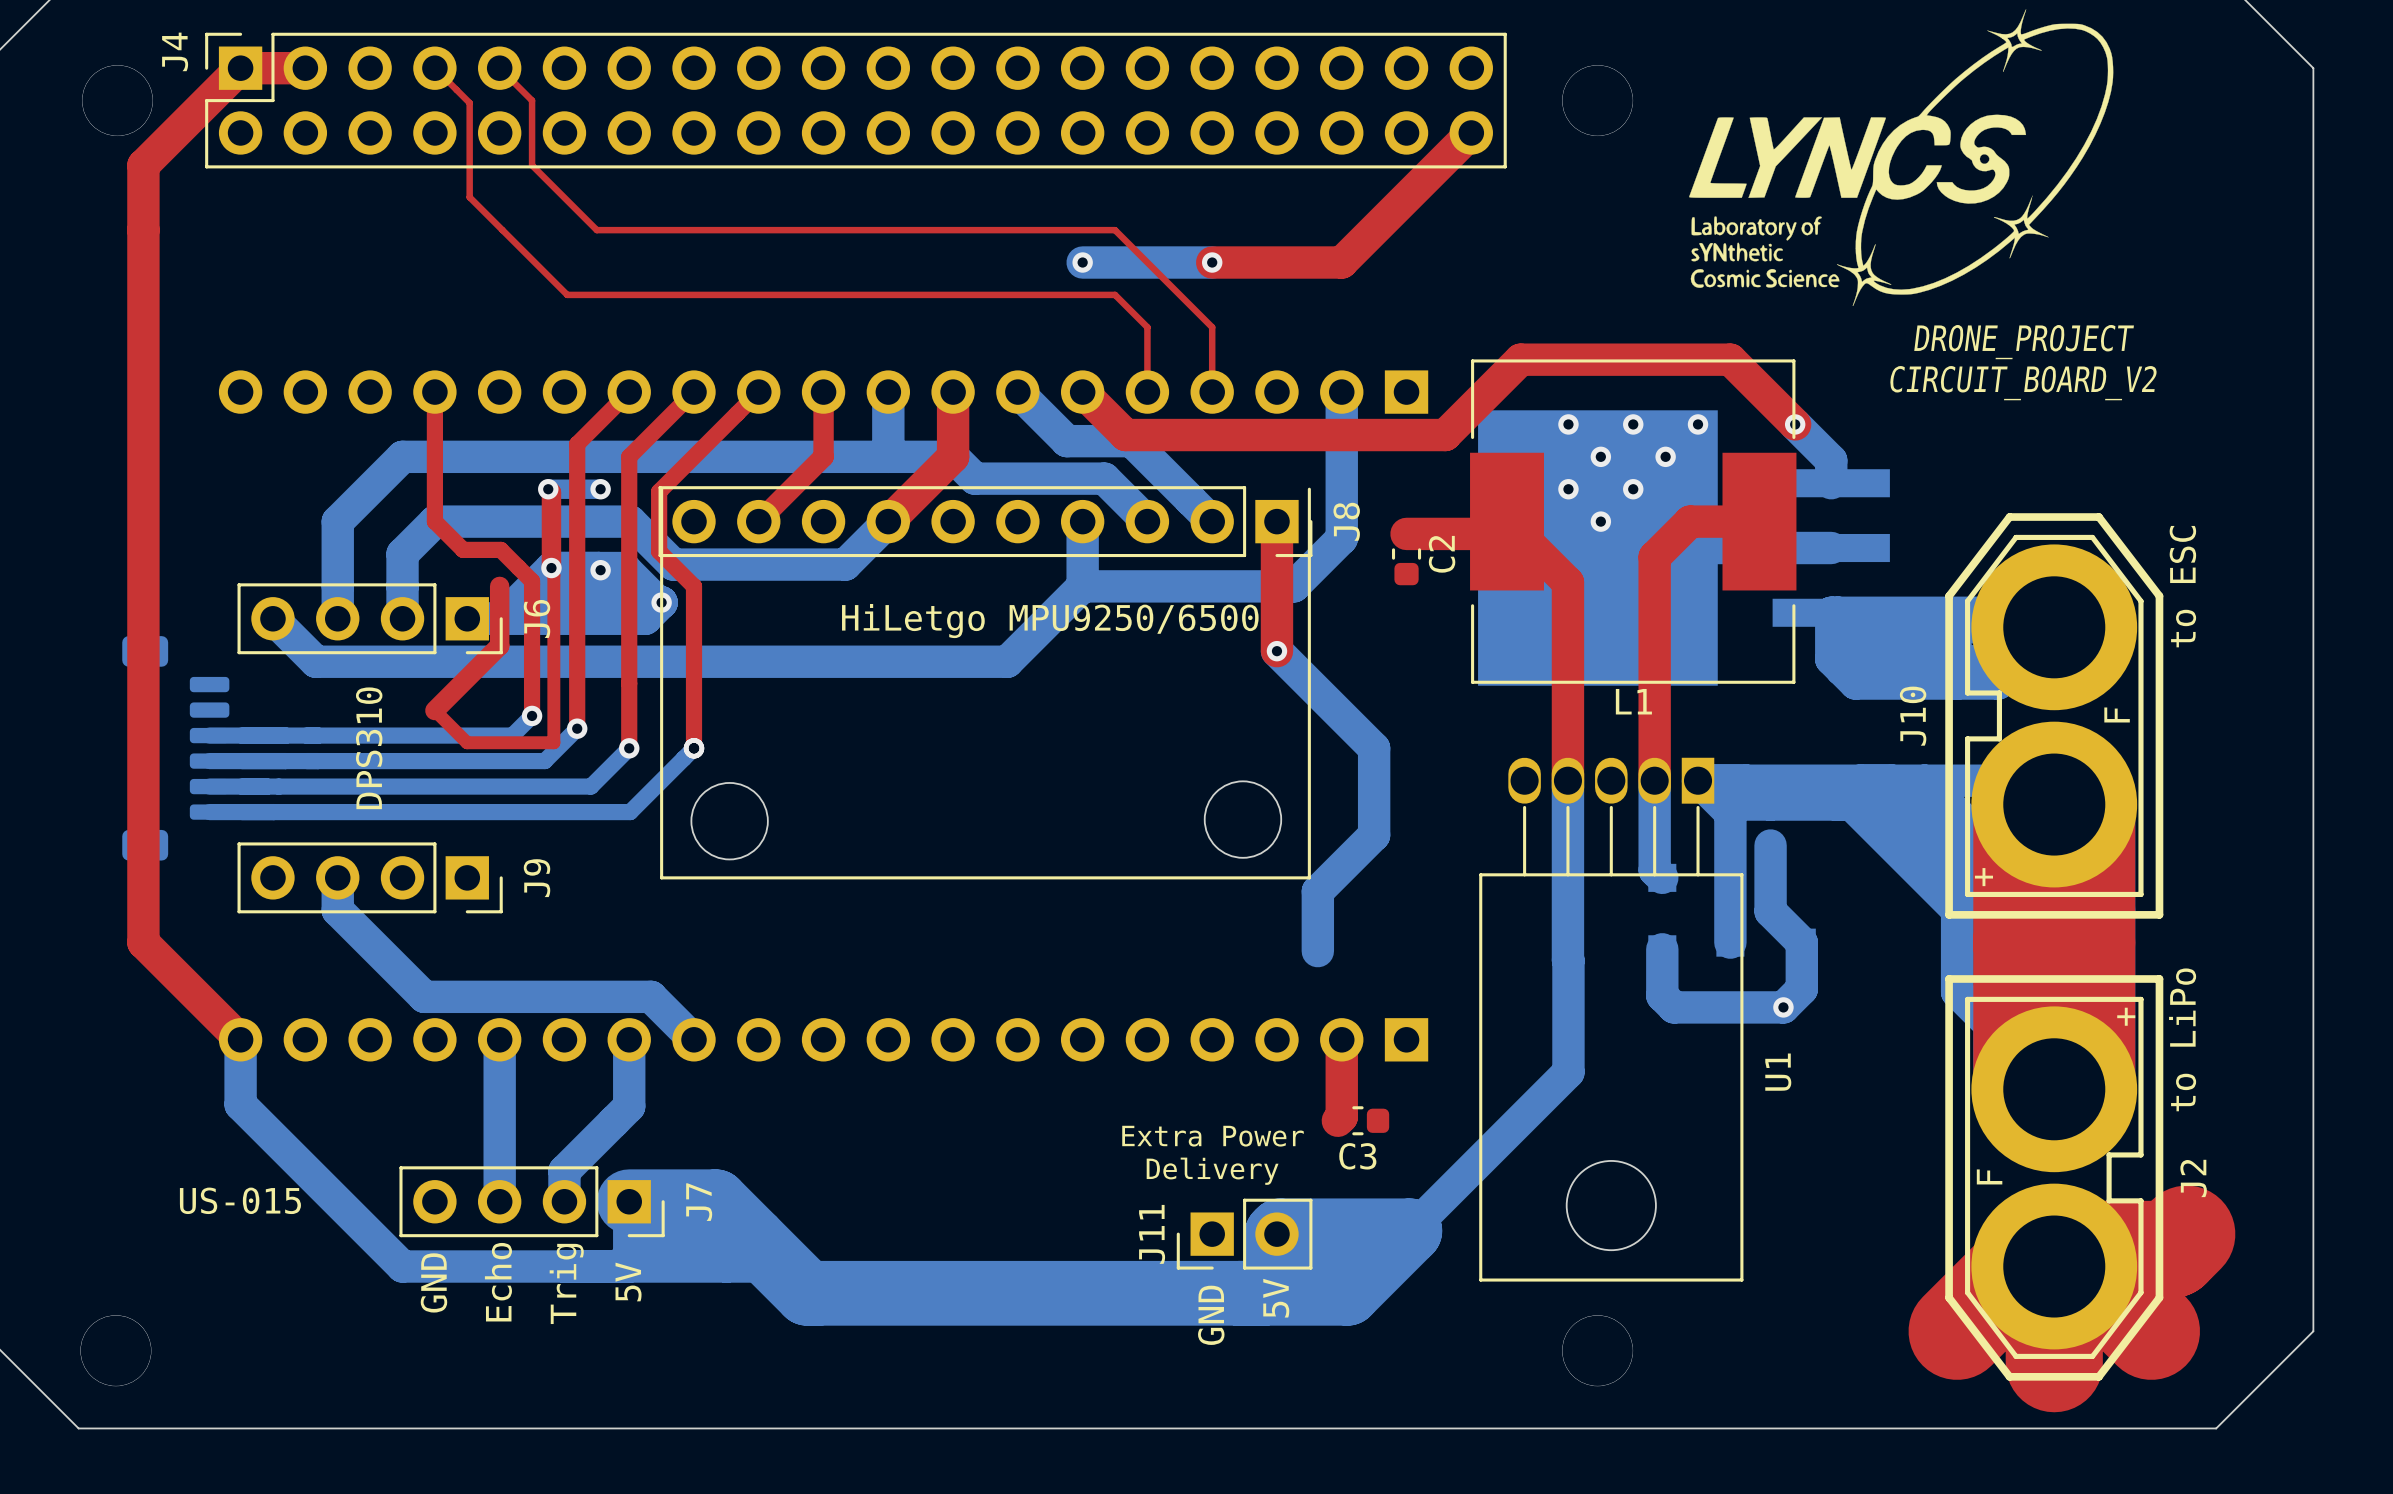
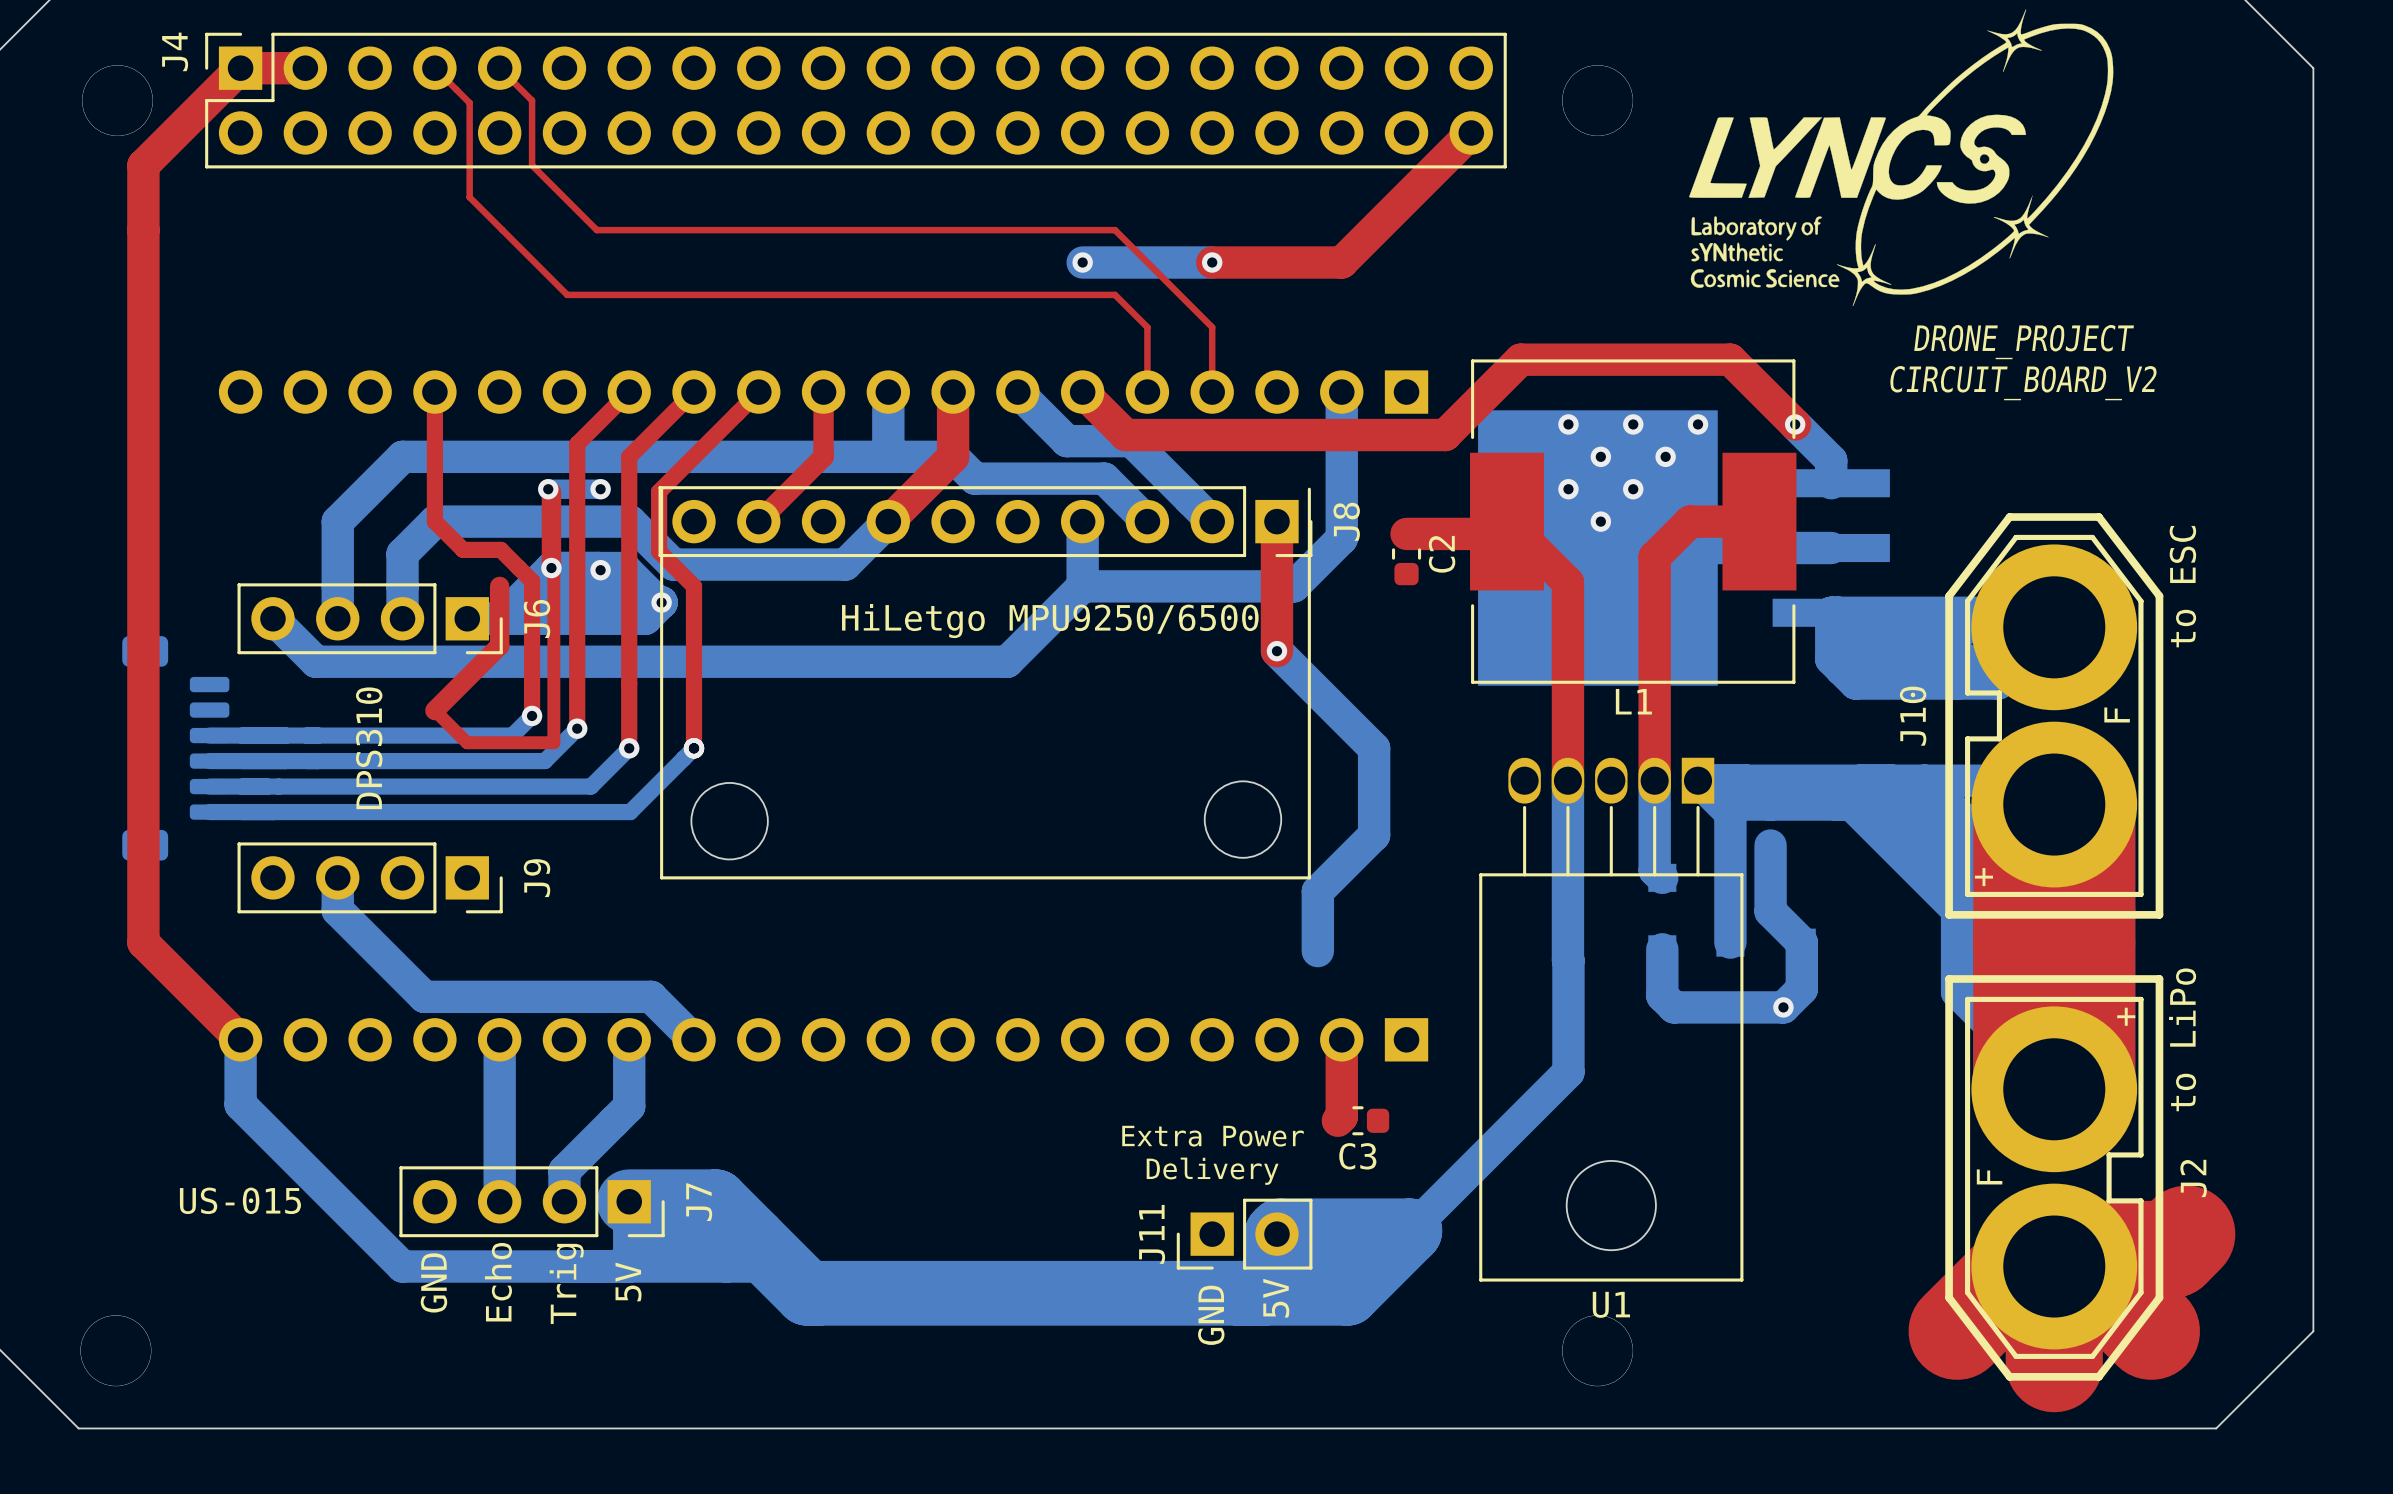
U1 name rotation: 0° (1778, 1072) -> 90° clockwise (1611, 1304)
U1 name position: U1 (1778, 1072) -> U1 (1611, 1304)

